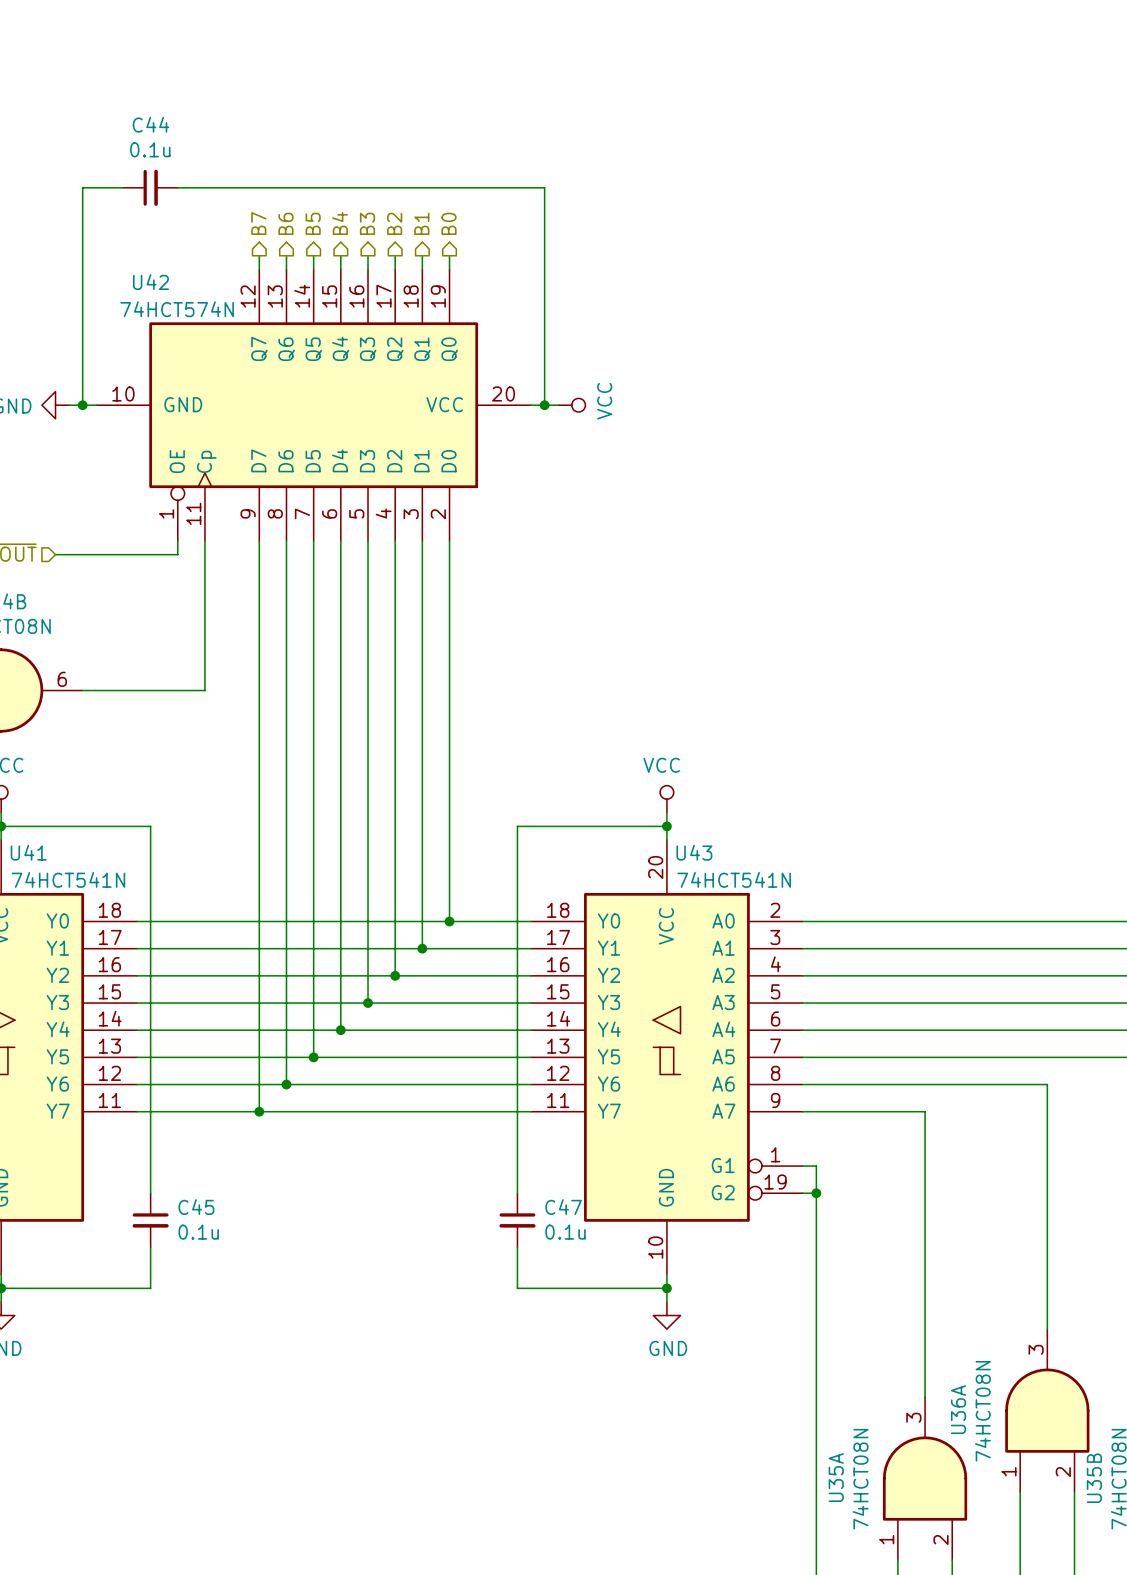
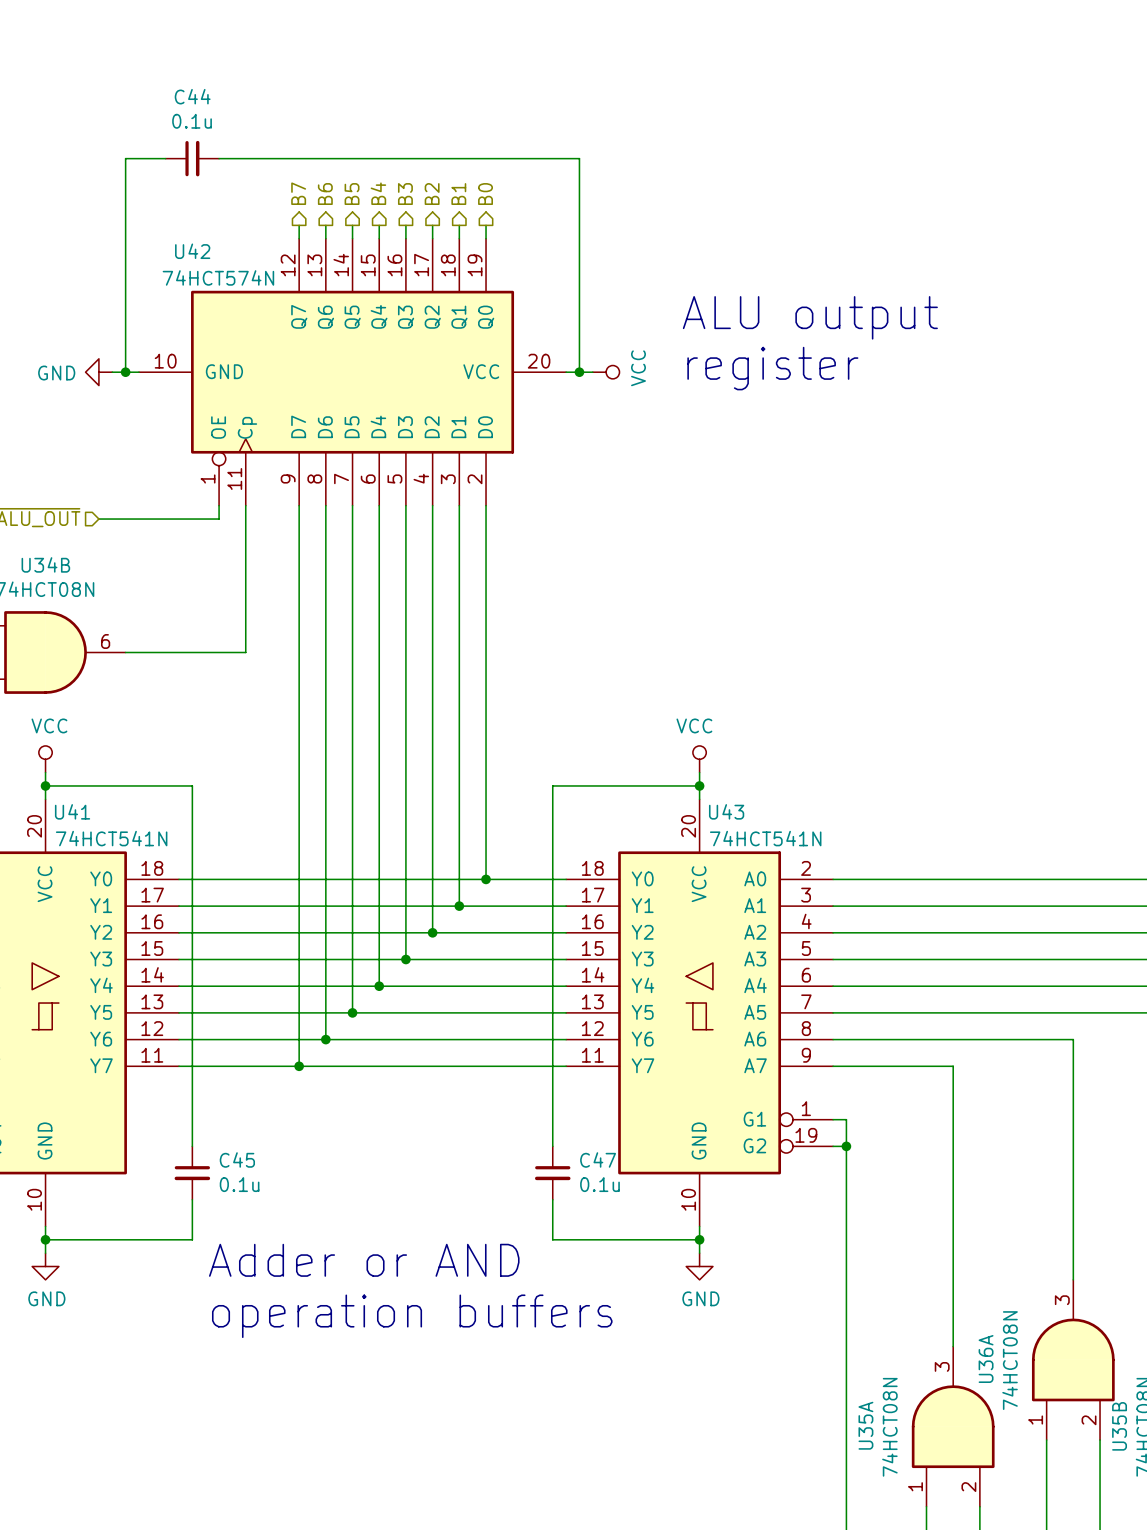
text: none -> ALU output (810, 317)
text: none -> register (772, 368)
text: none -> Adder or AND (364, 1260)
text: none -> operation buffers (412, 1316)

